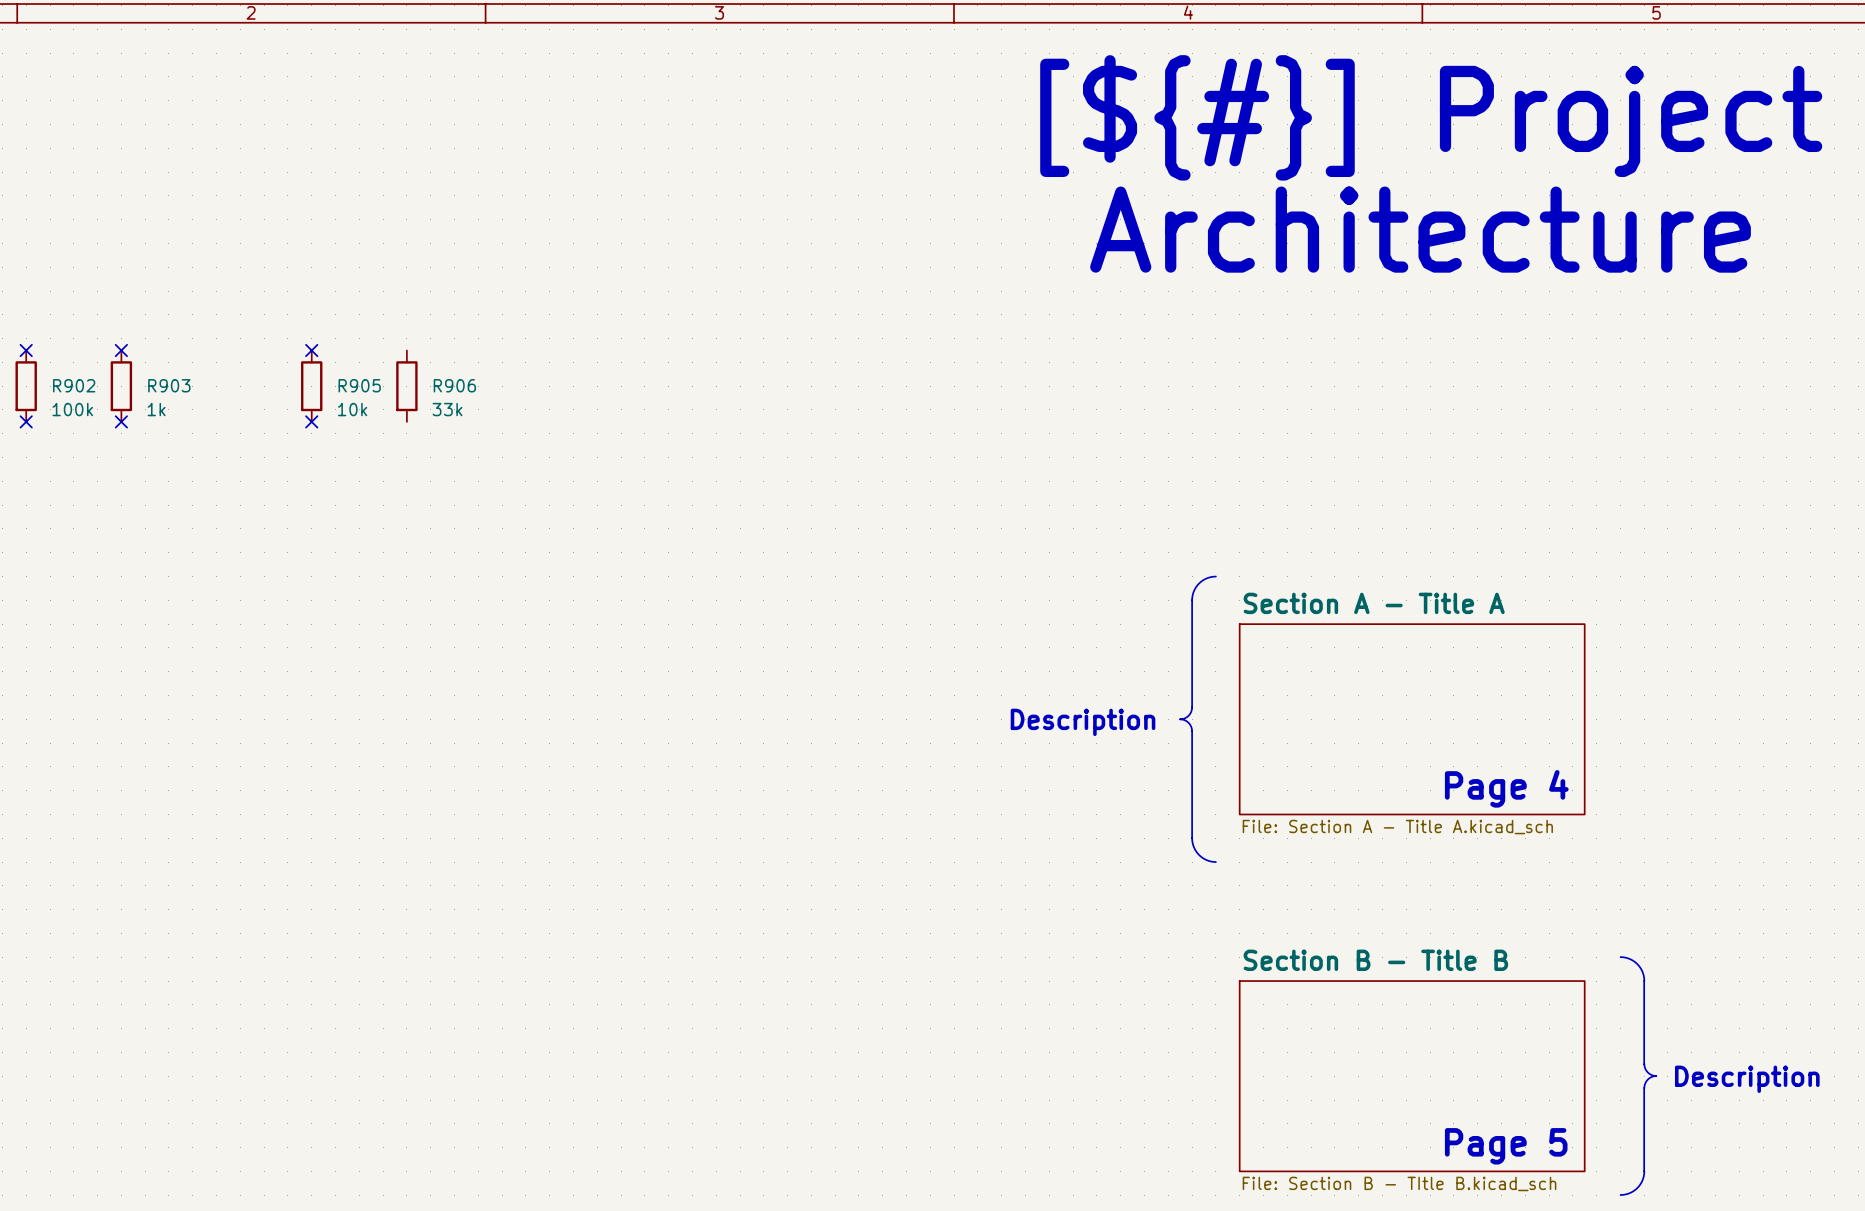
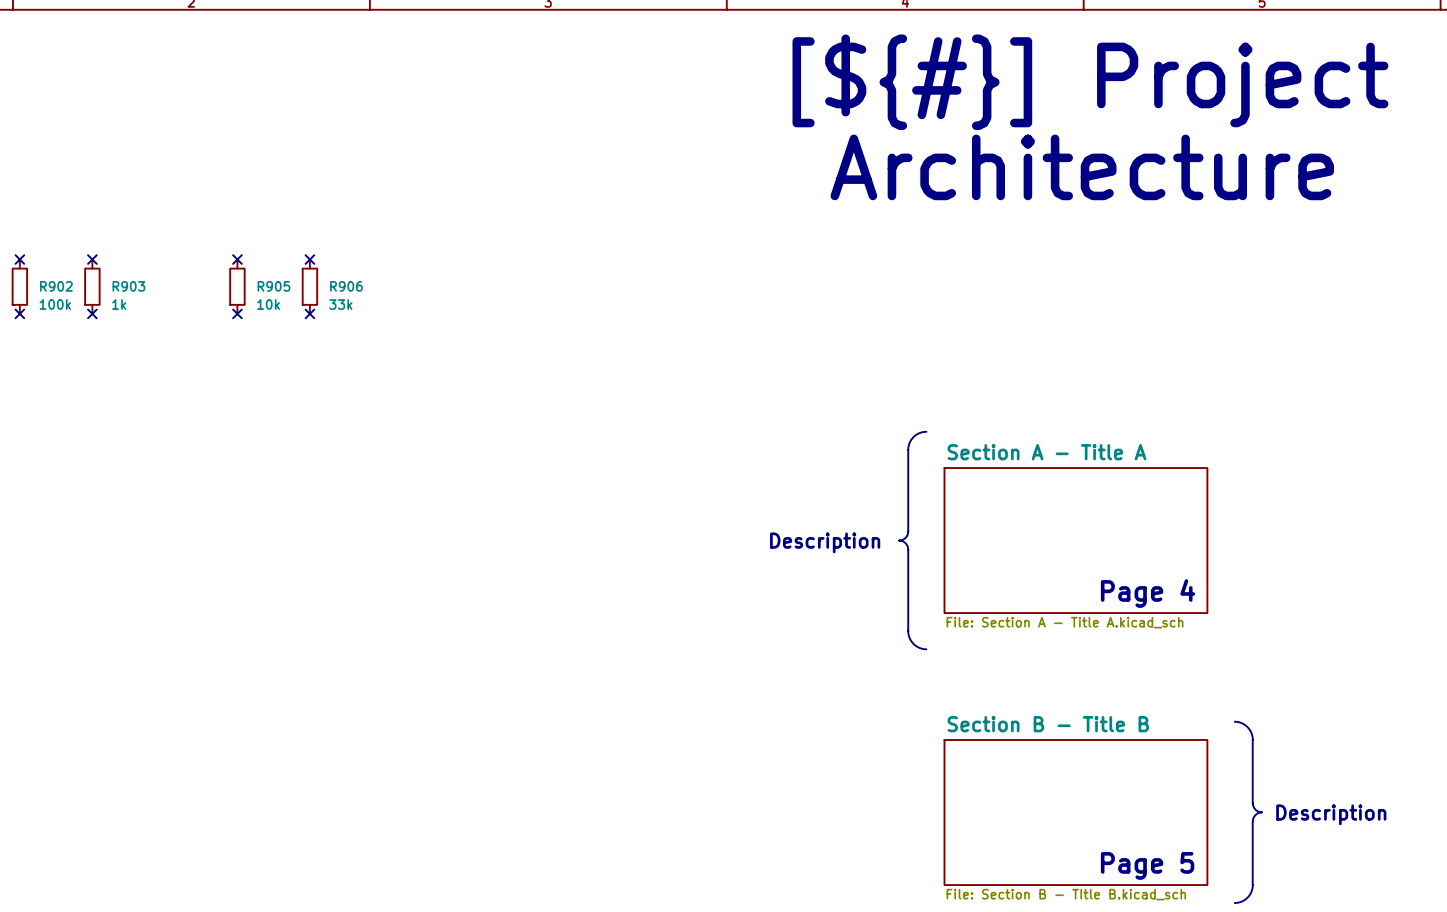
no-connect mark: none -> (309, 259)
no-connect mark: none -> (309, 313)

